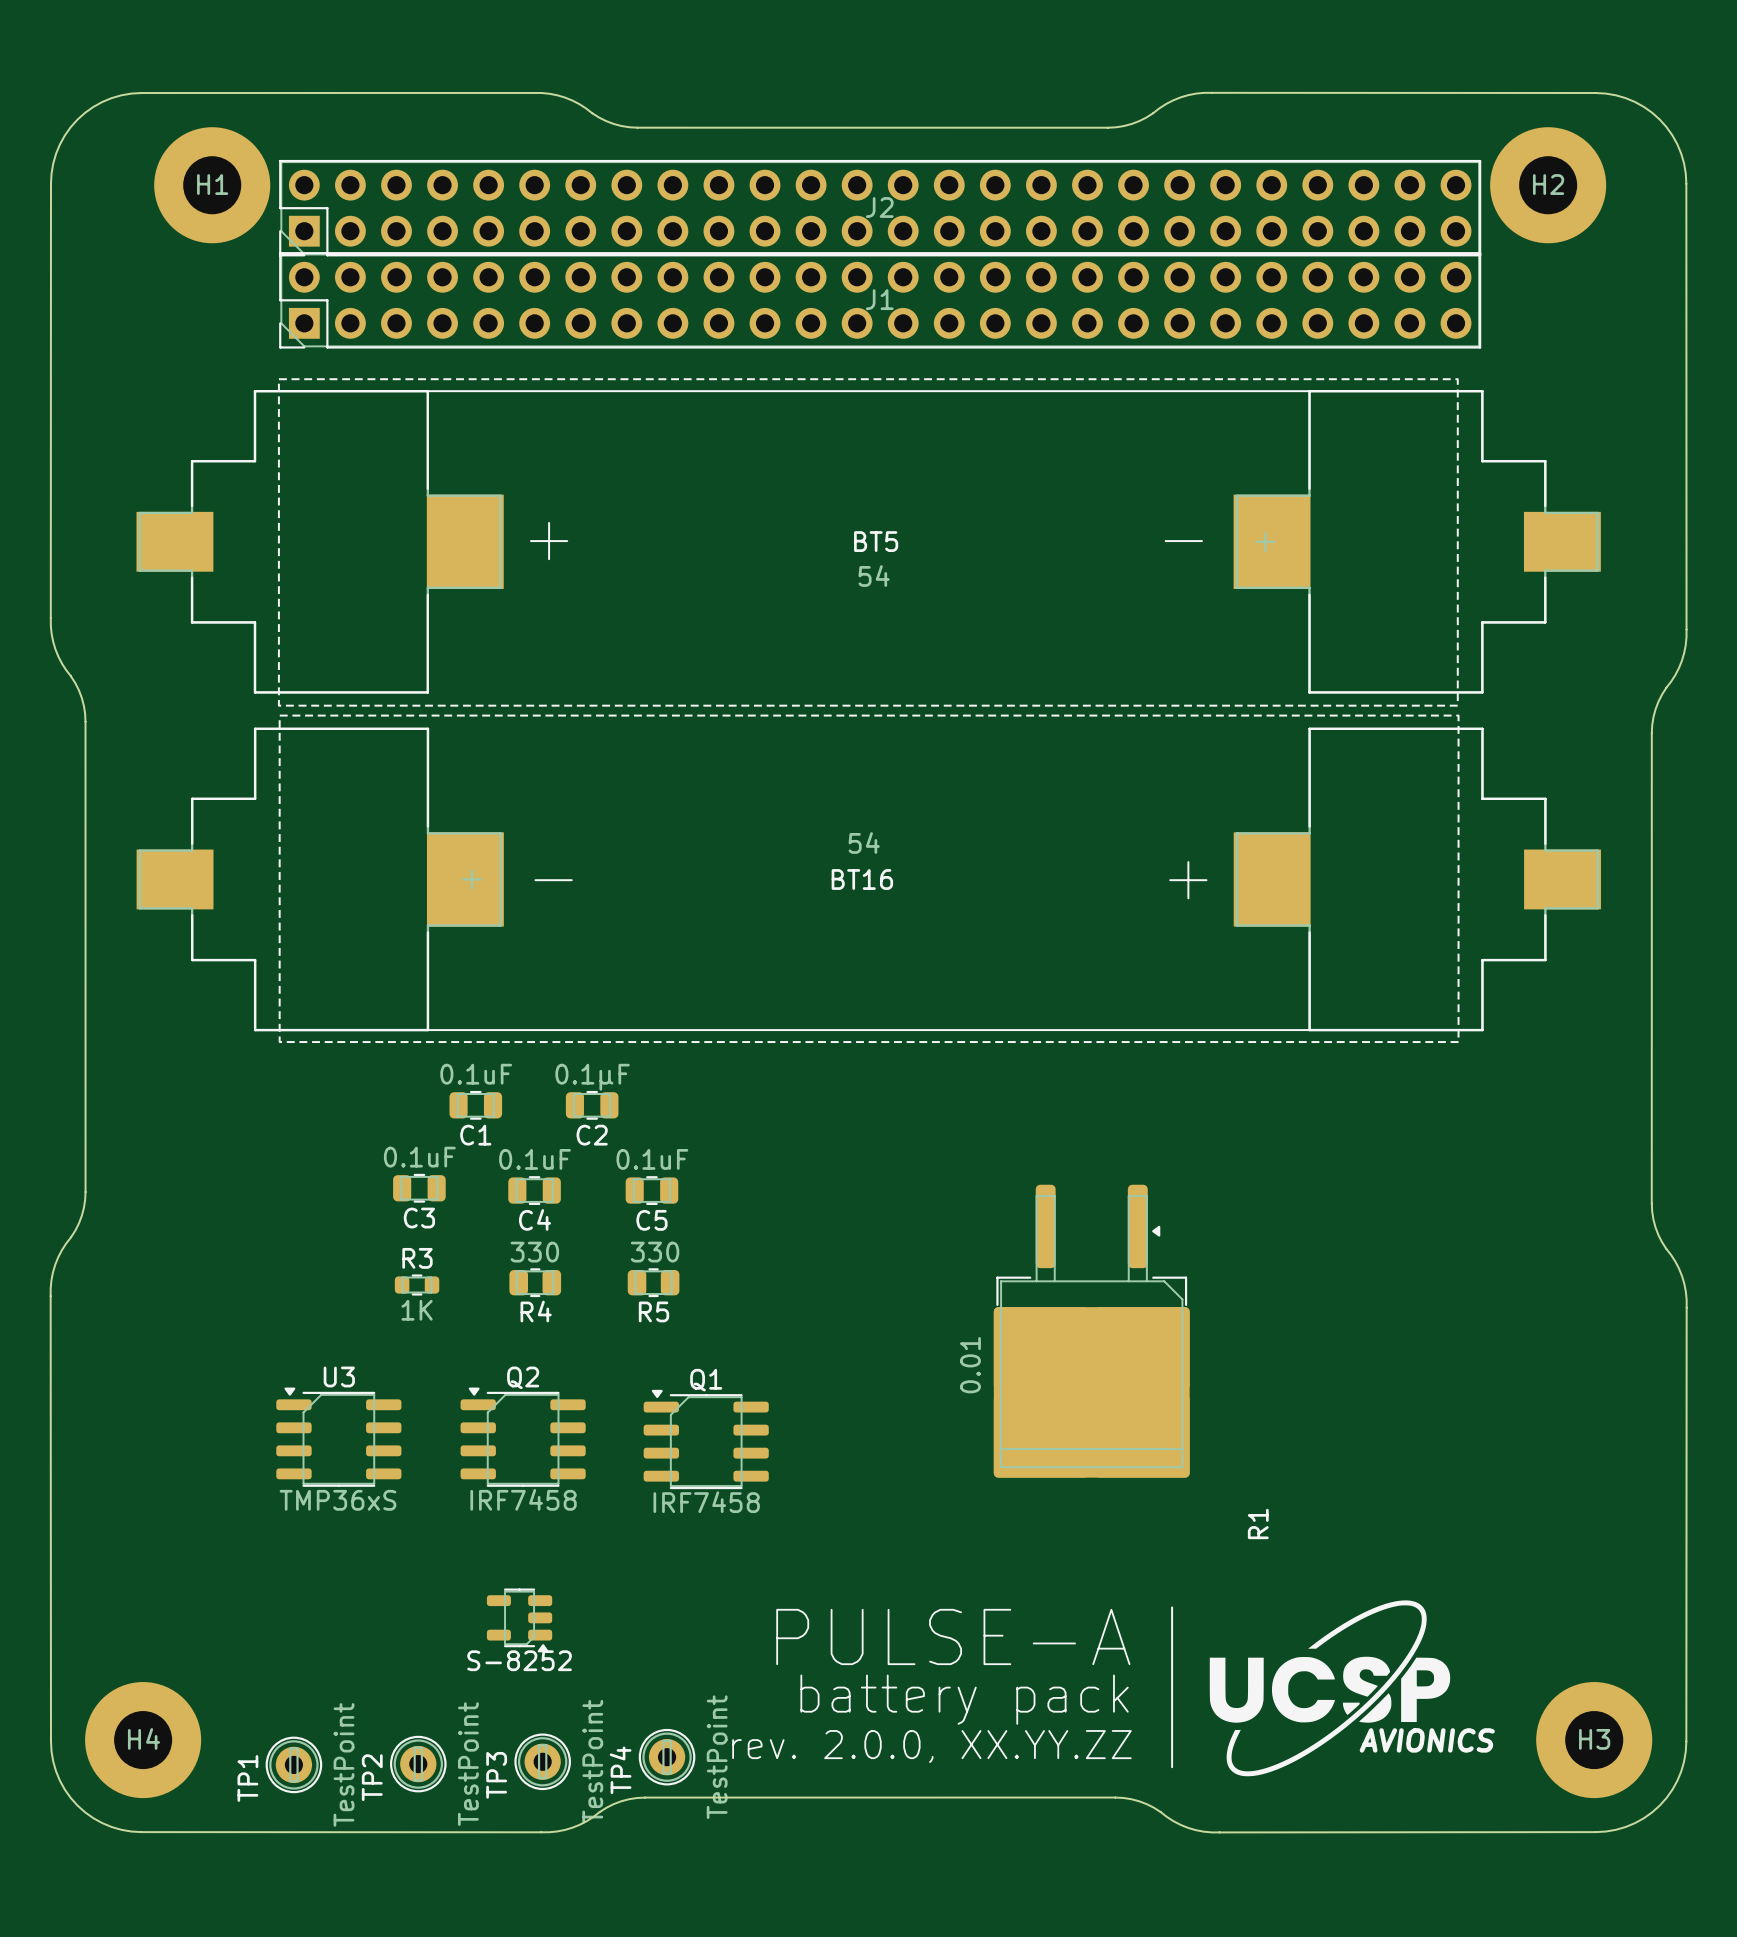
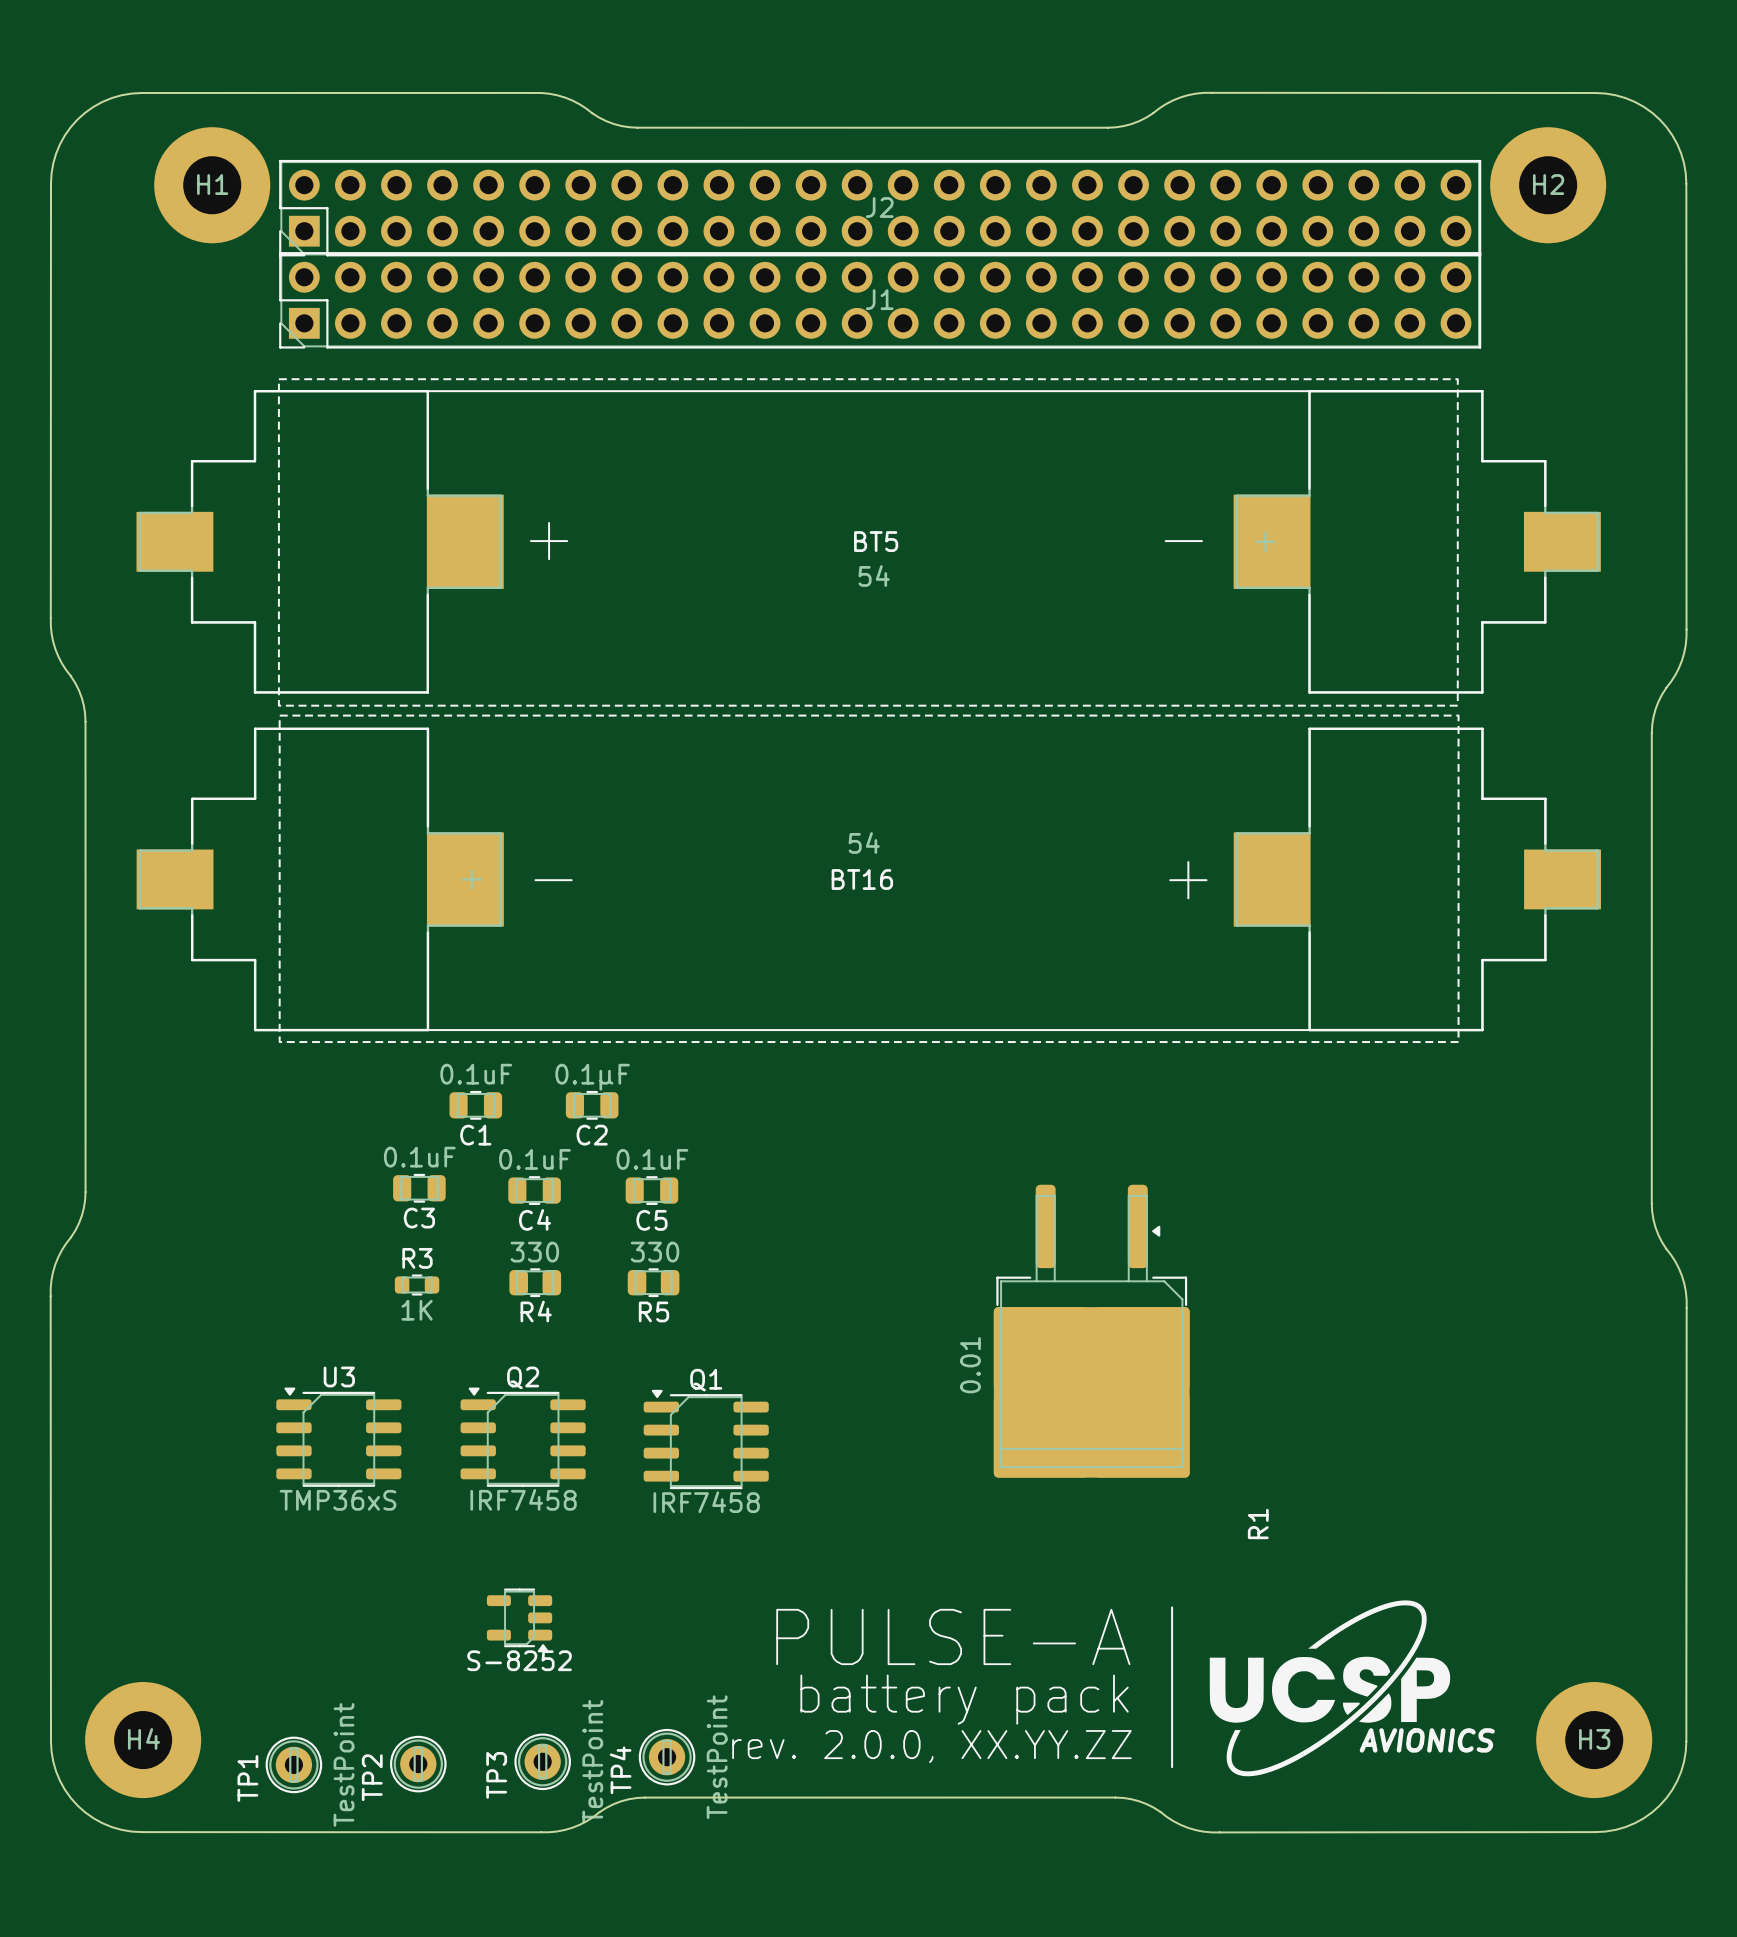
TP2 value: TestPoint (468, 1764) -> none

